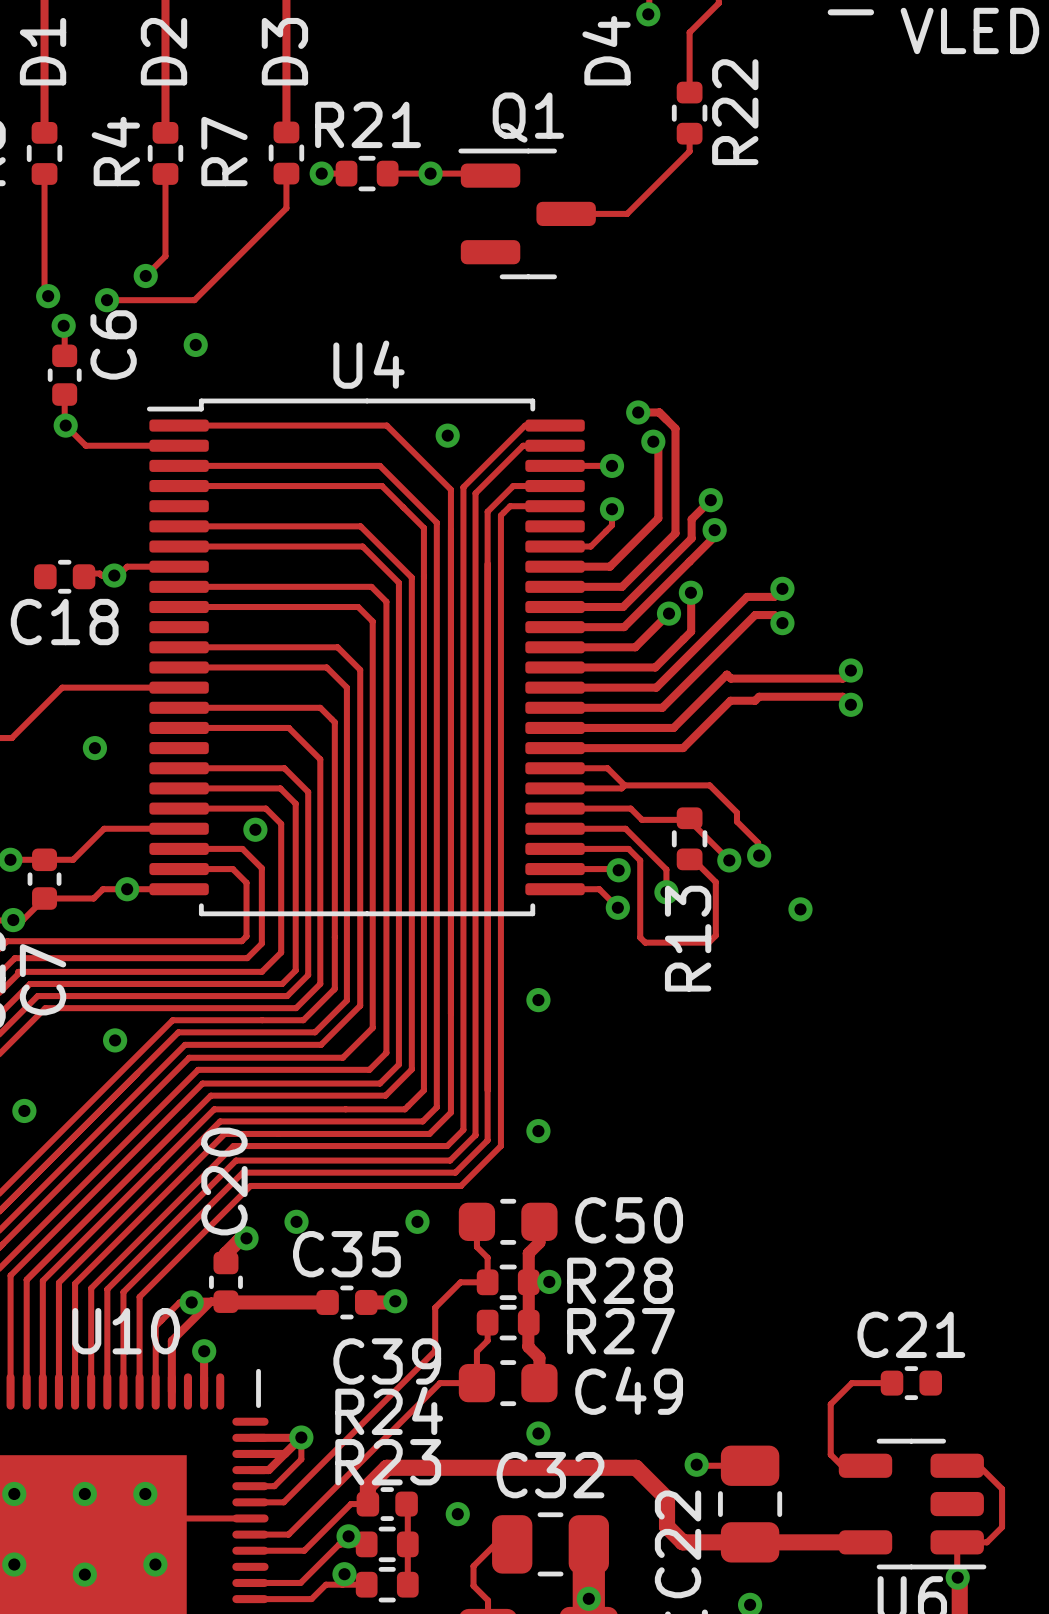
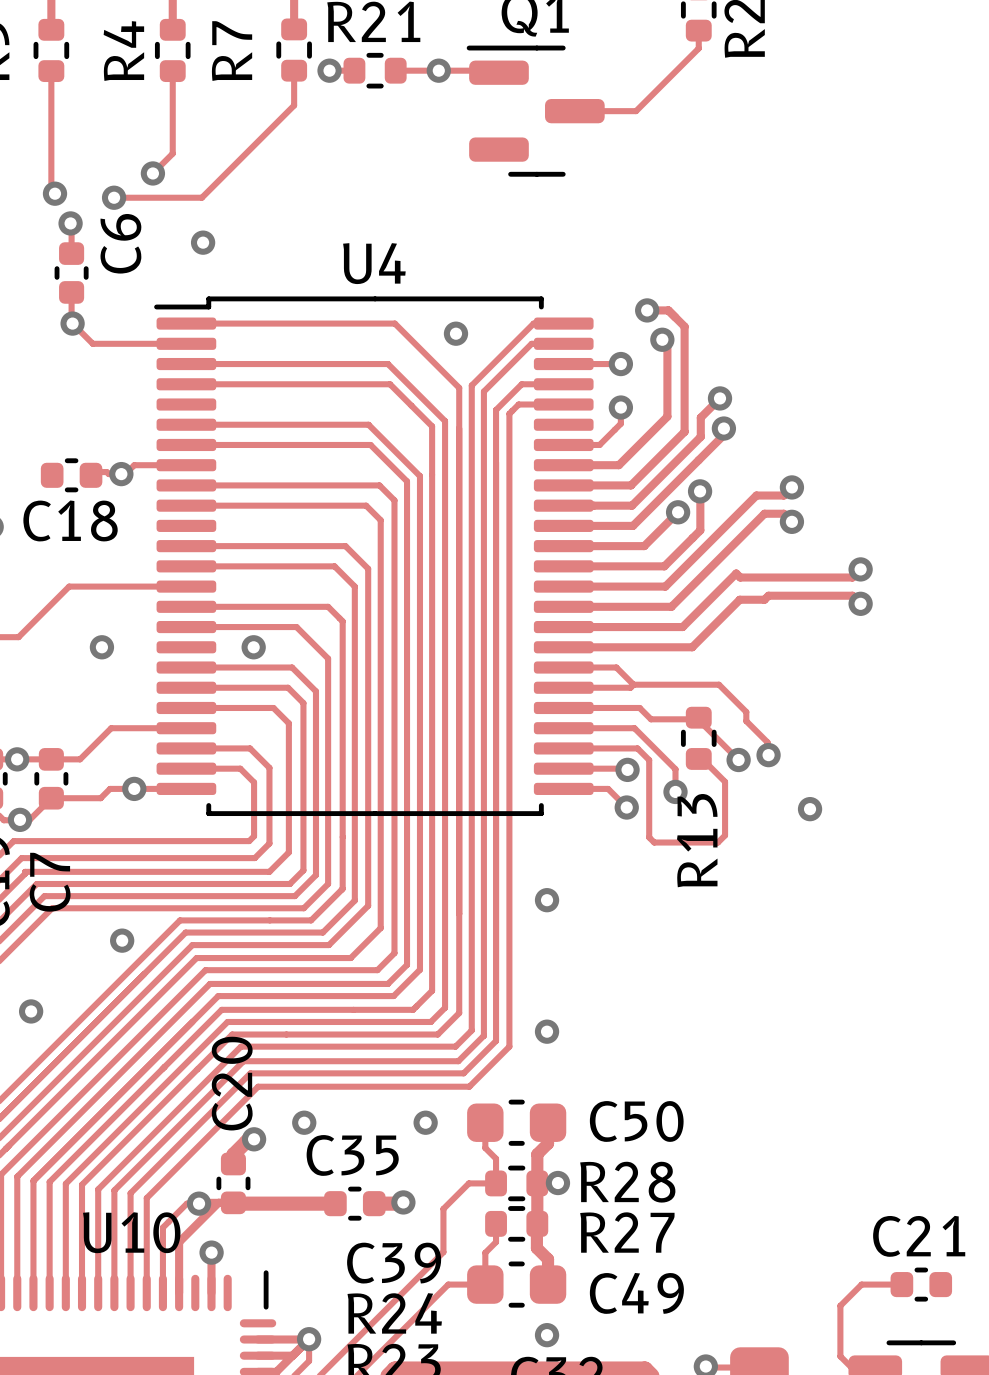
via position: (255, 829) -> (253, 647)

